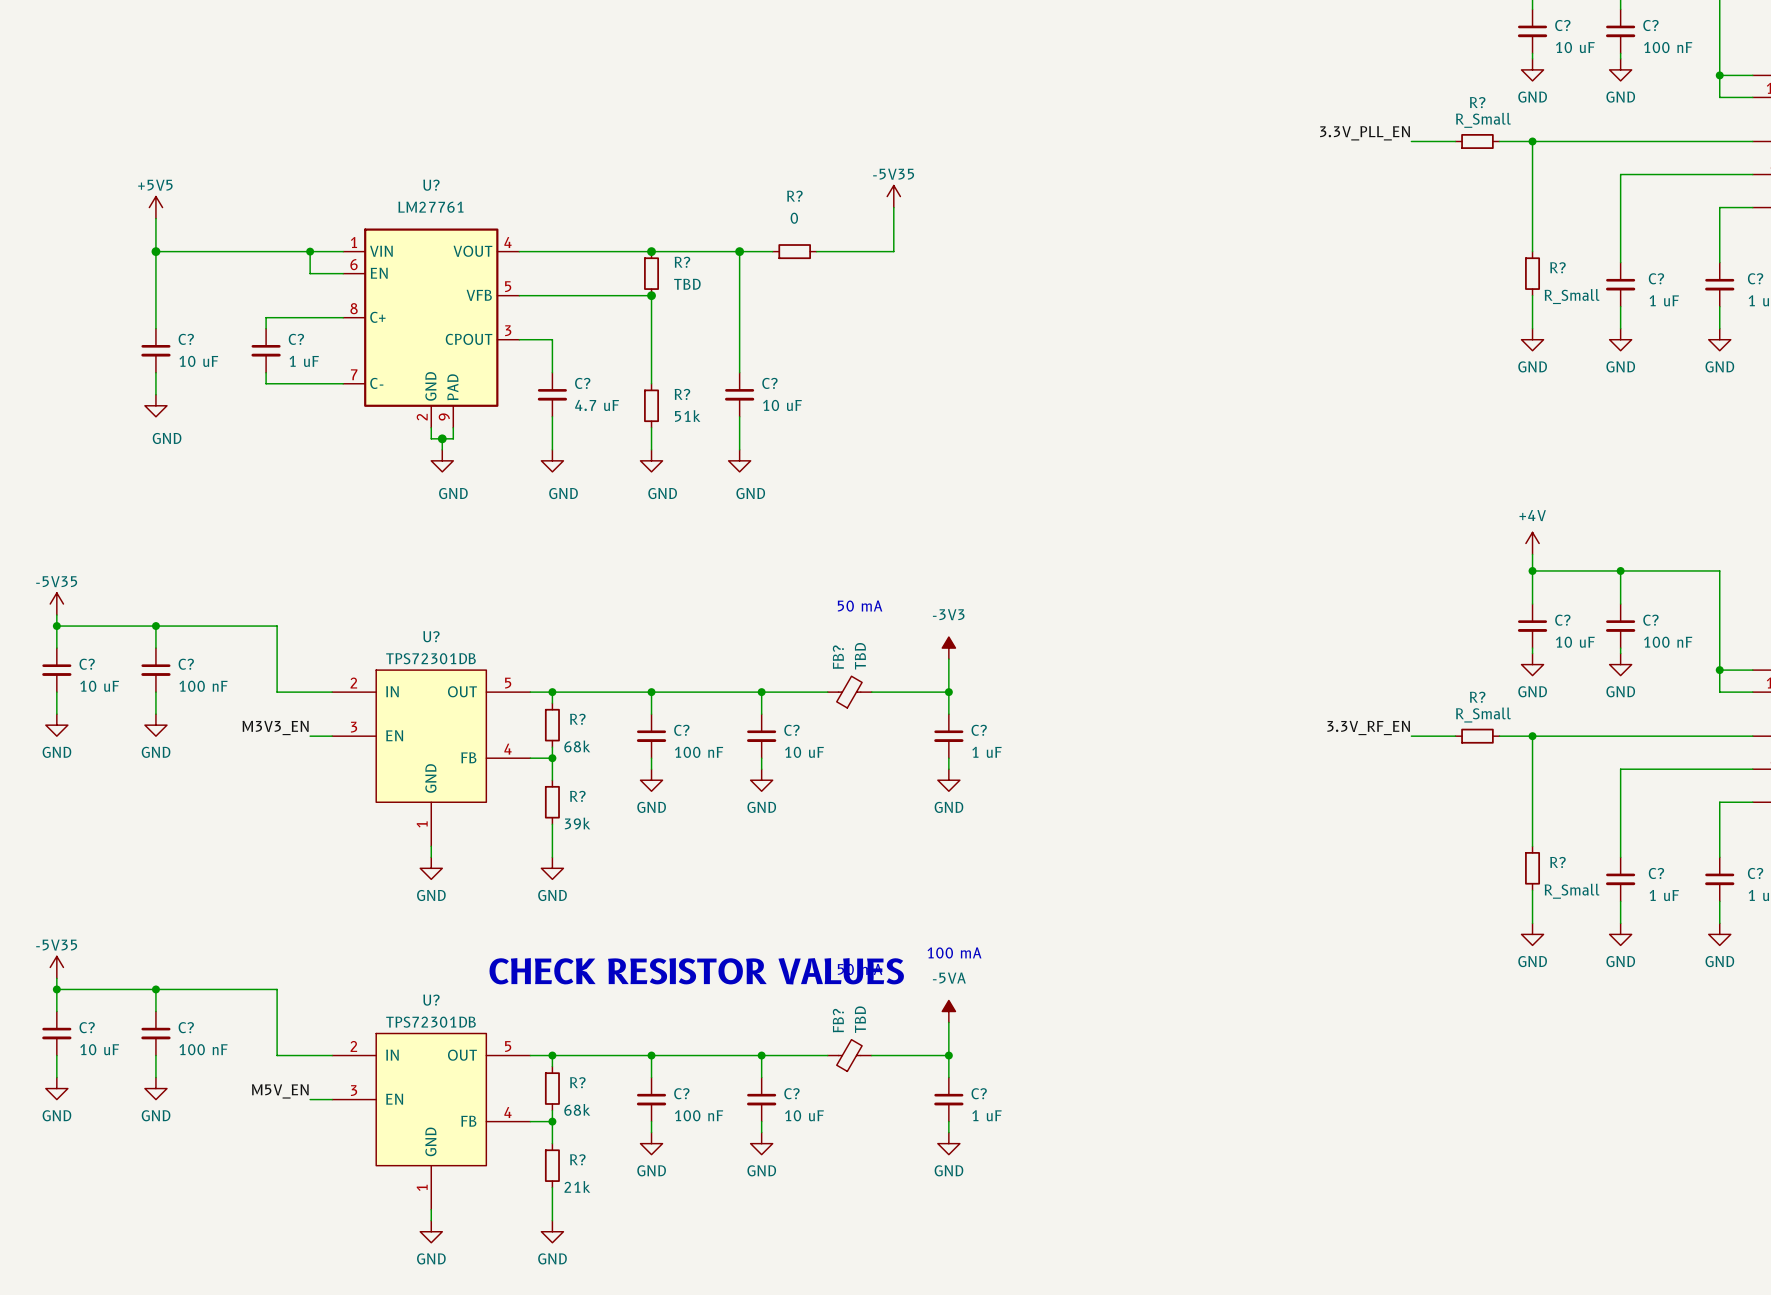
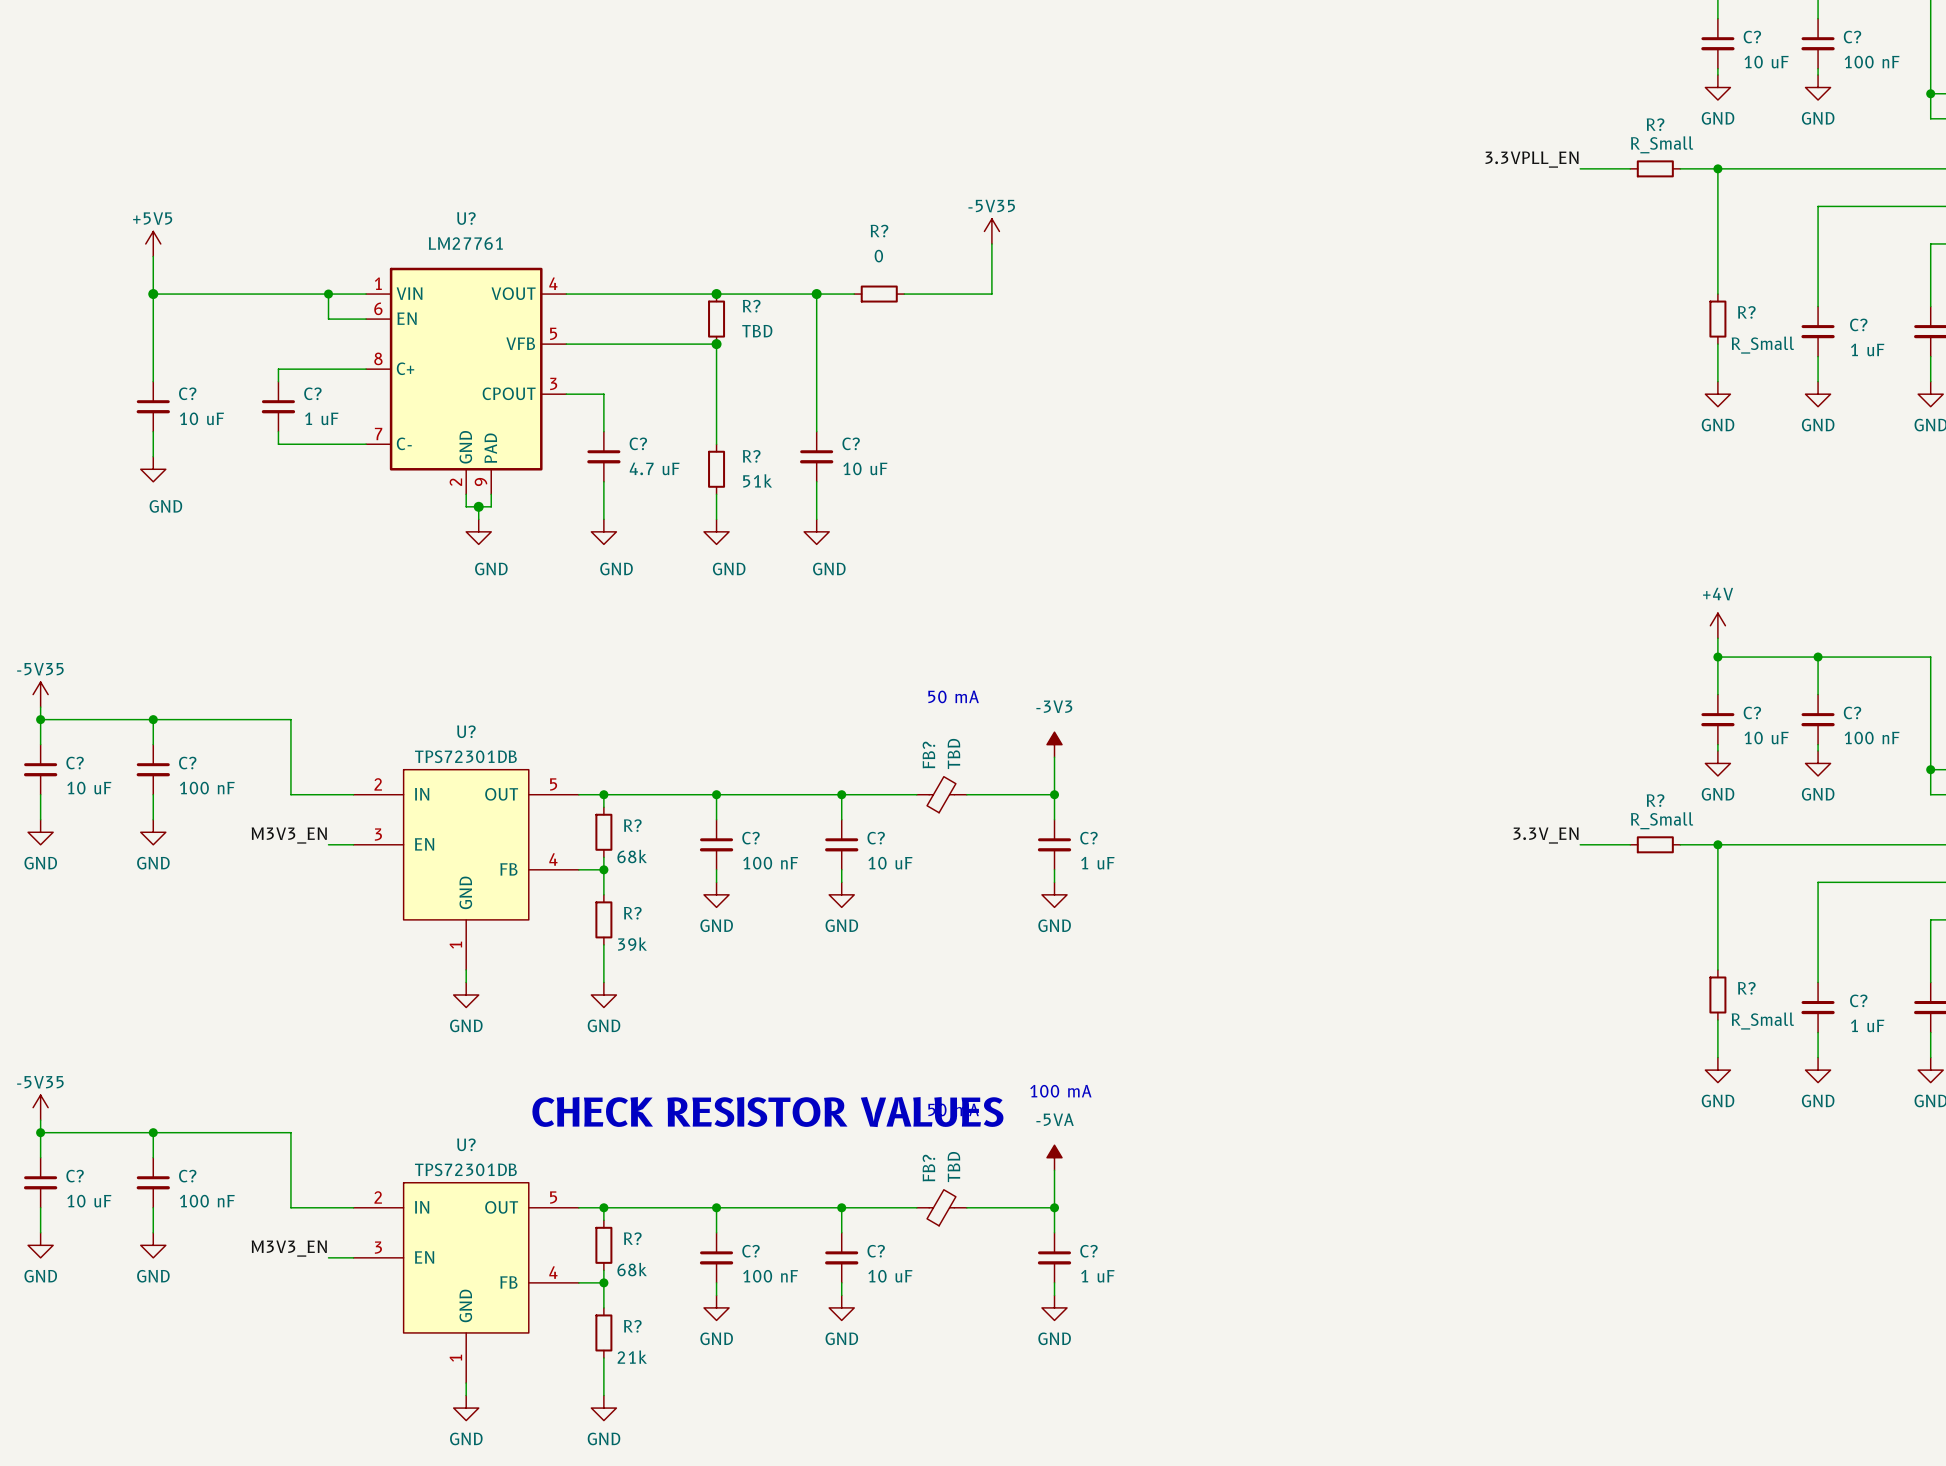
label: 3.3V_PLL_EN (1365, 133) -> 3.3VPLL_EN (1532, 159)
label: 3.3V_RF_EN (1368, 727) -> 3.3V_EN (1546, 835)
label: M5V_EN (280, 1091) -> M3V3_EN (289, 1248)

